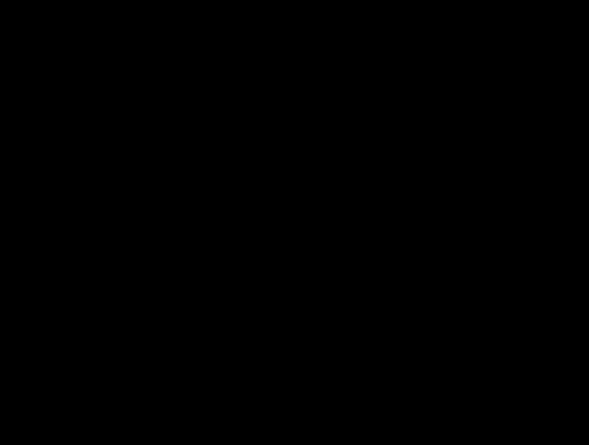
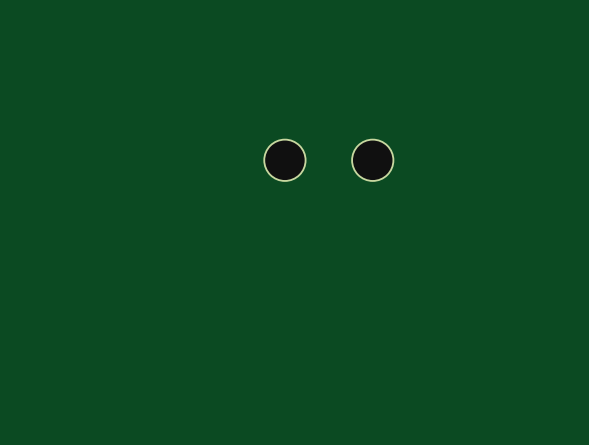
part: none -> (328, 160)

